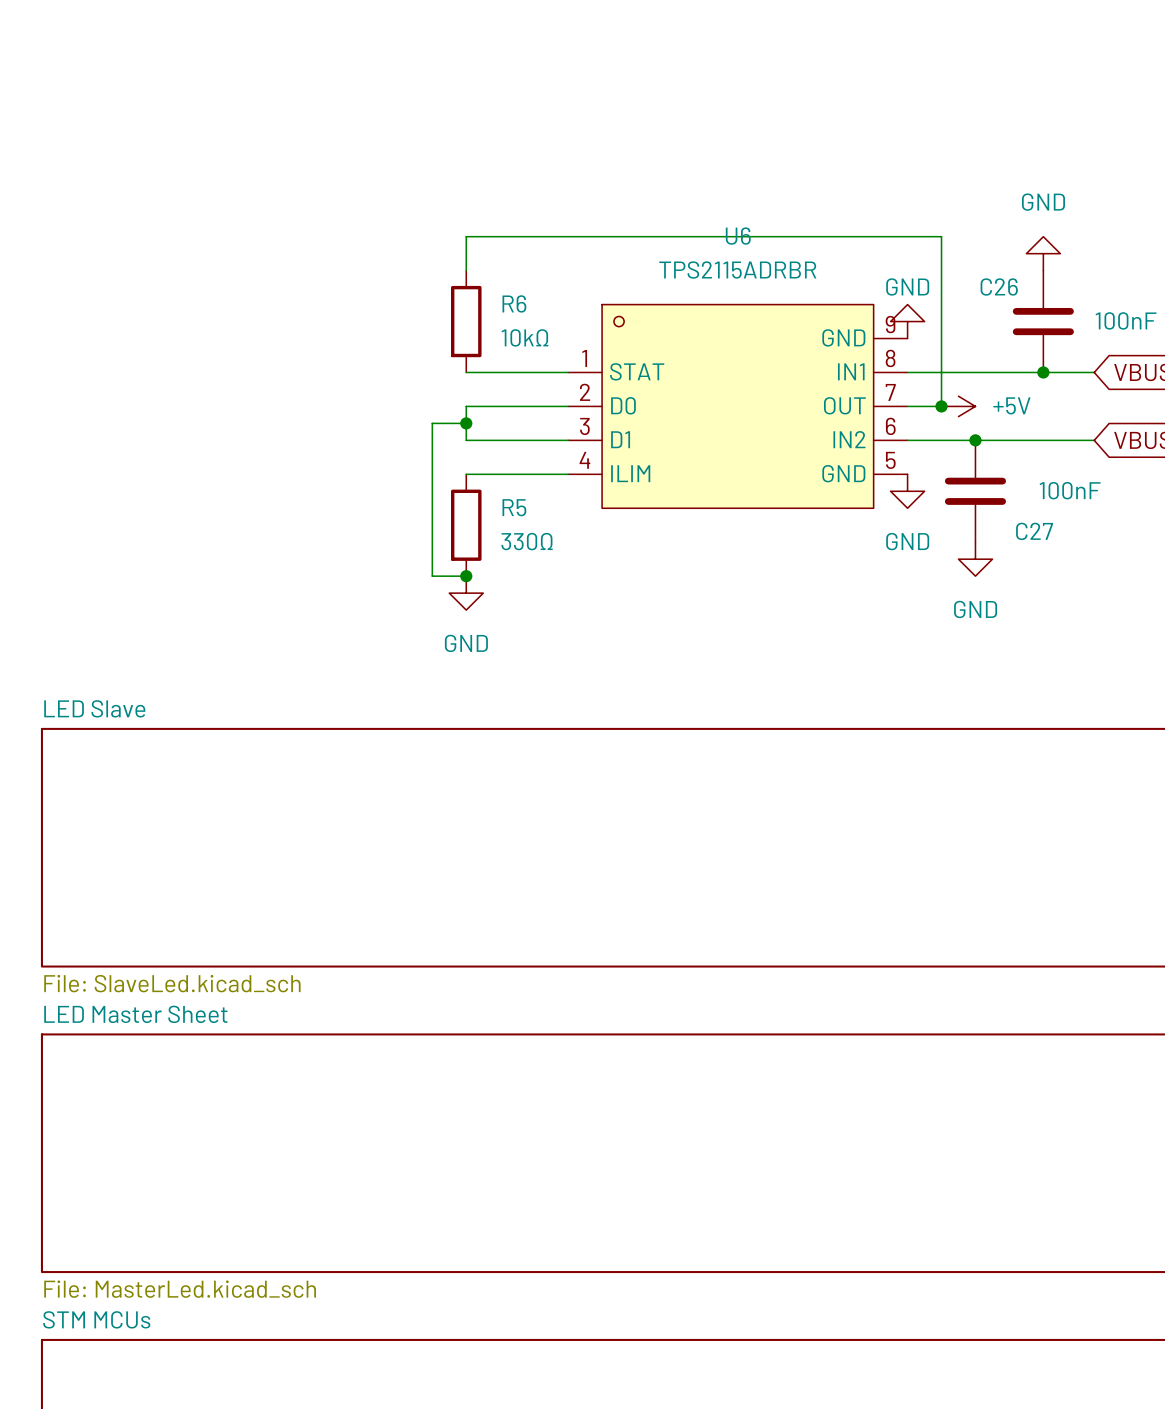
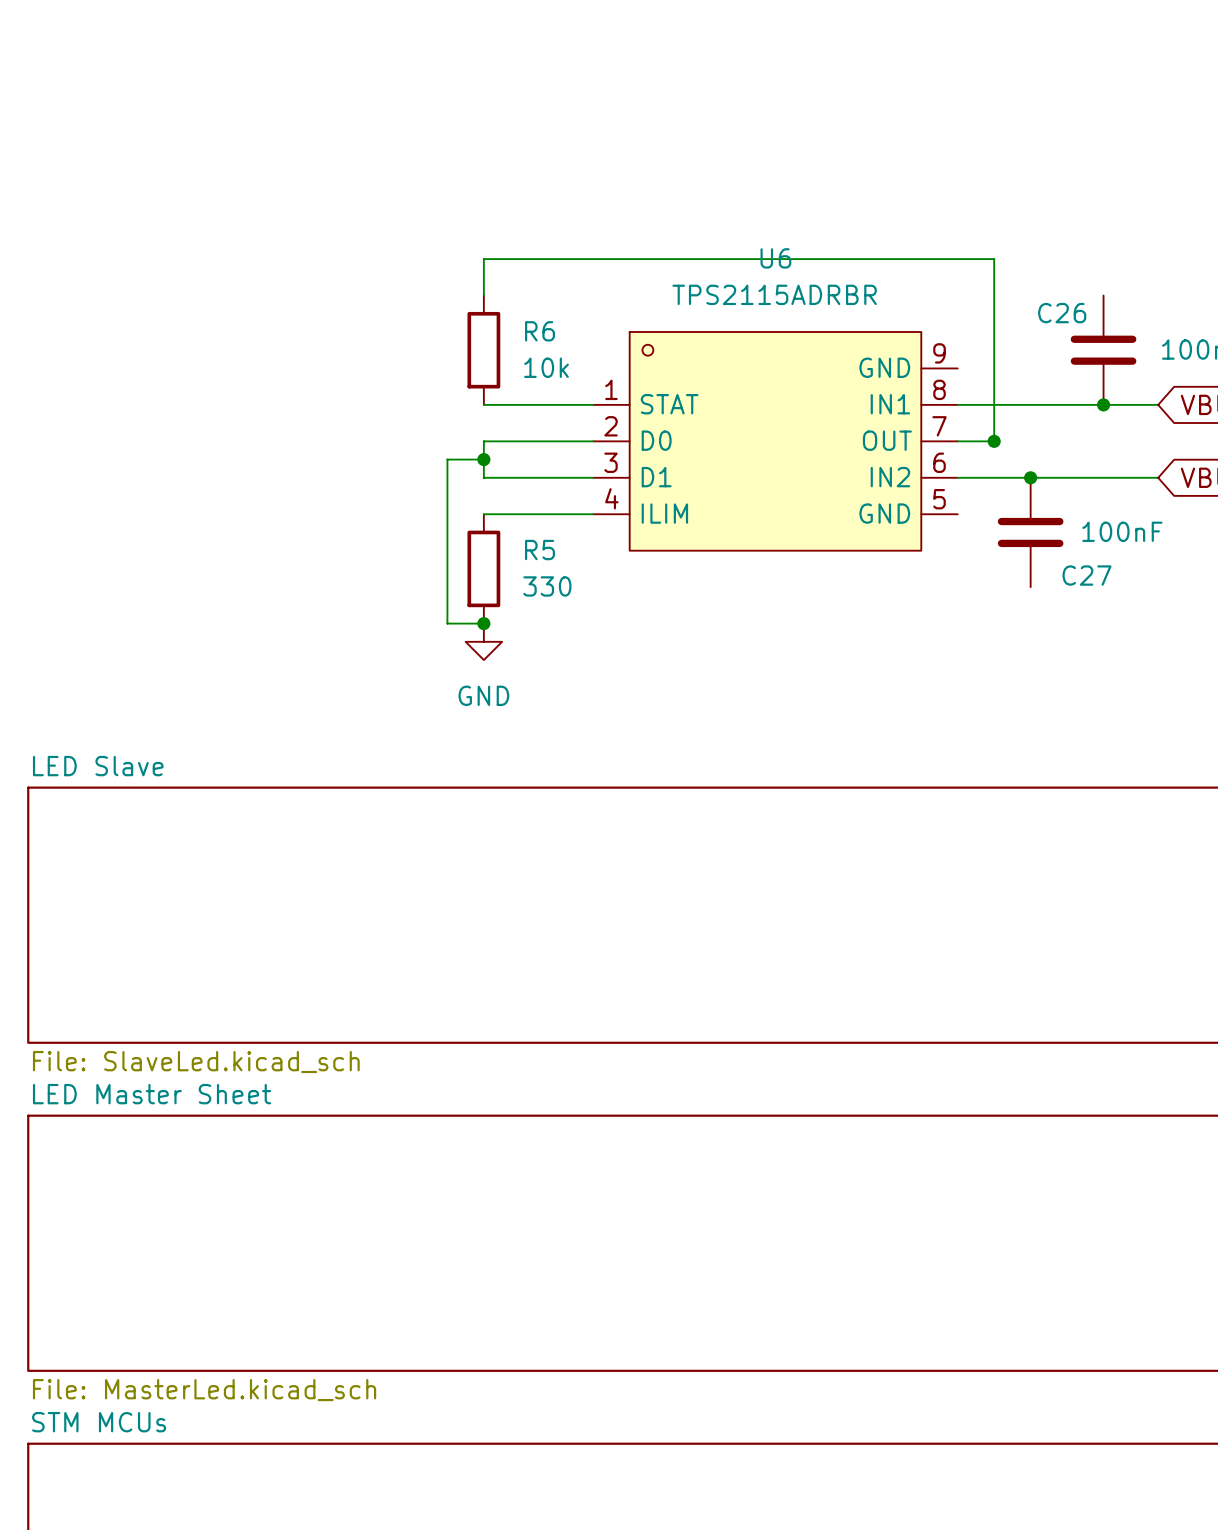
power symbol: GND (1043, 253) -> none
power symbol: GND (907, 321) -> none
R6 value: 10kΩ (524, 337) -> 10k (546, 367)
power symbol: +5V (958, 406) -> none
power symbol: GND (907, 491) -> none
R5 value: 330Ω (527, 541) -> 330 (547, 586)
power symbol: GND (975, 559) -> none

